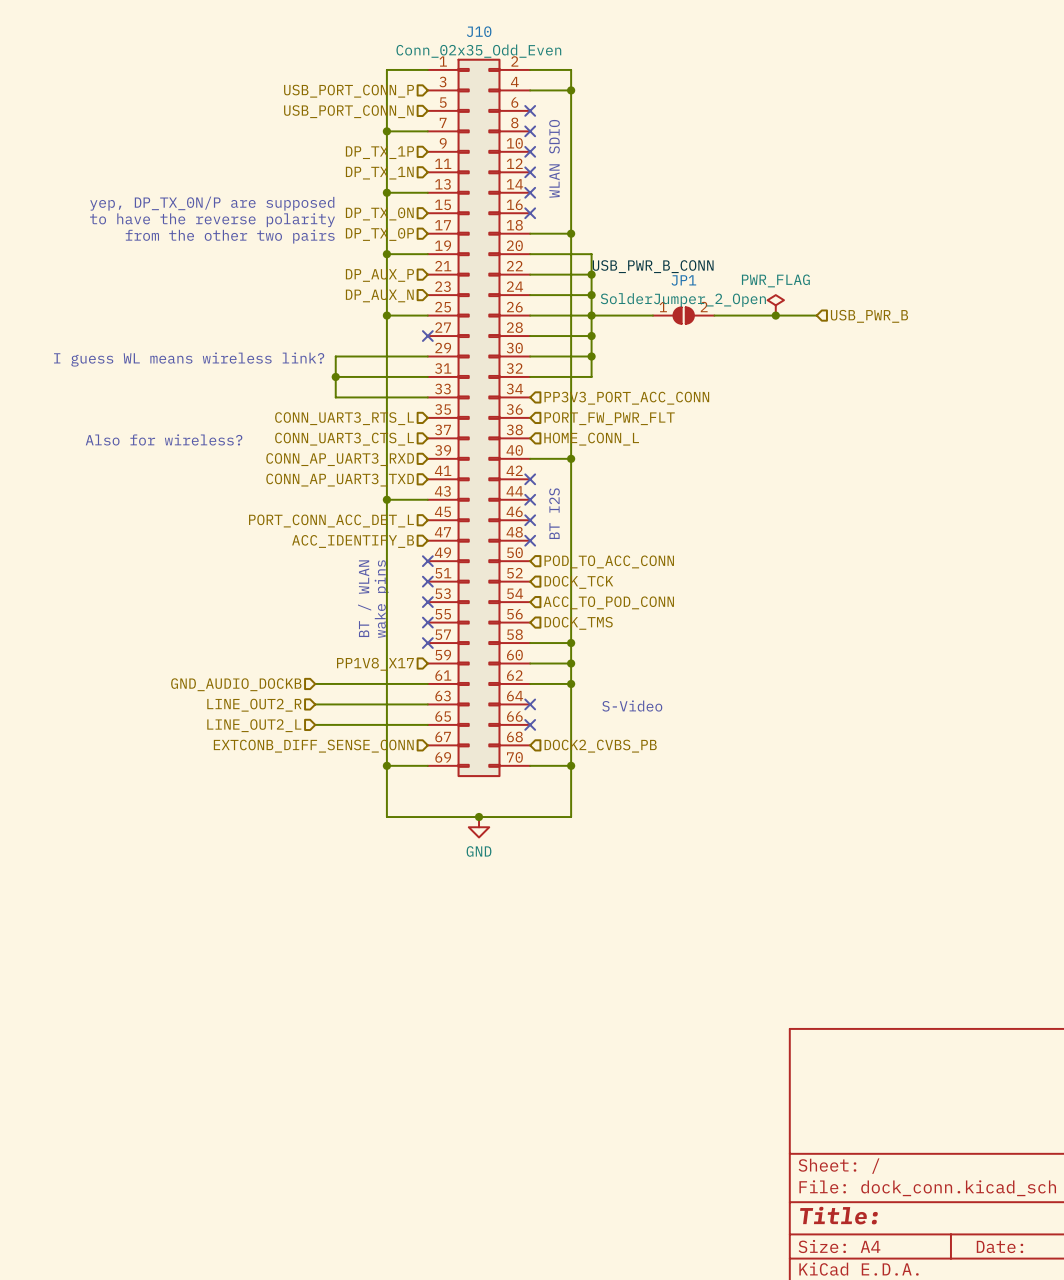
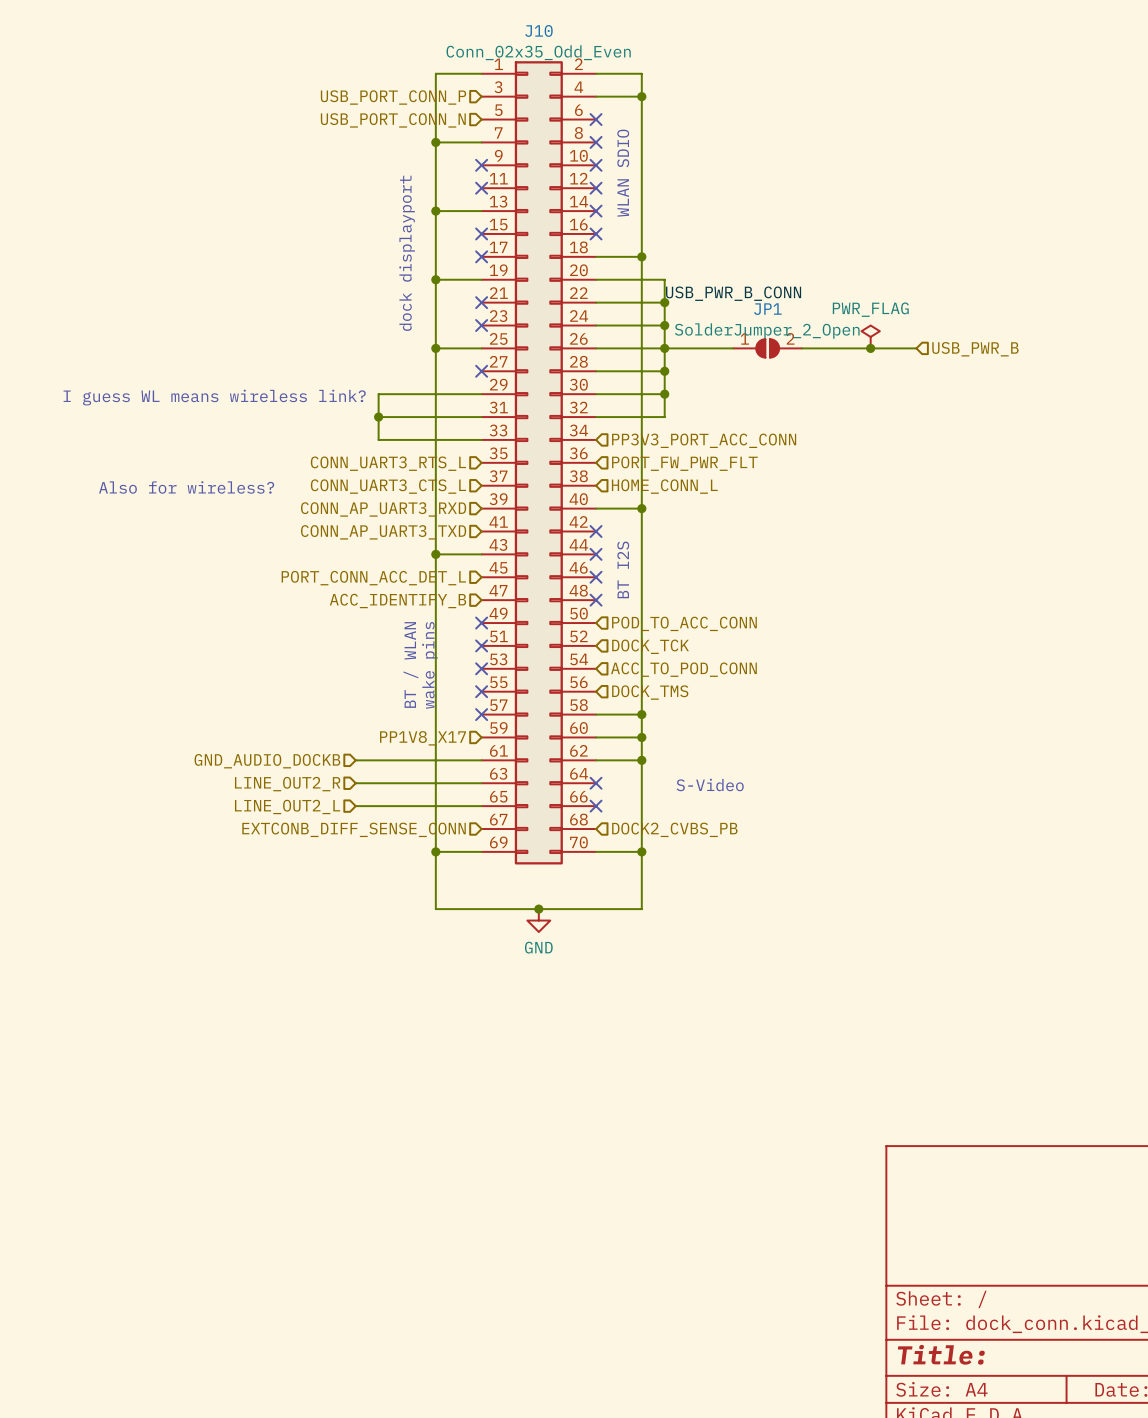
no-connect mark: none -> (481, 165)
hierarchical label: DP_TX_1P (379, 152) -> none
no-connect mark: none -> (481, 188)
hierarchical label: DP_TX_1N (379, 173) -> none
text: yep, DP_TX_0N/P are supposed (212, 203) -> none
no-connect mark: none -> (481, 233)
hierarchical label: DP_TX_0N (379, 214) -> none
text: to have the reverse polarity (212, 220) -> none
text: none -> dock displayport (407, 253)
no-connect mark: none -> (481, 256)
hierarchical label: DP_TX_0P (379, 234) -> none
text: from the other two pairs (230, 236) -> none
no-connect mark: none -> (481, 302)
hierarchical label: DP_AUX_P (379, 275) -> none
hierarchical label: DP_AUX_N (379, 295) -> none
no-connect mark: none -> (481, 325)

